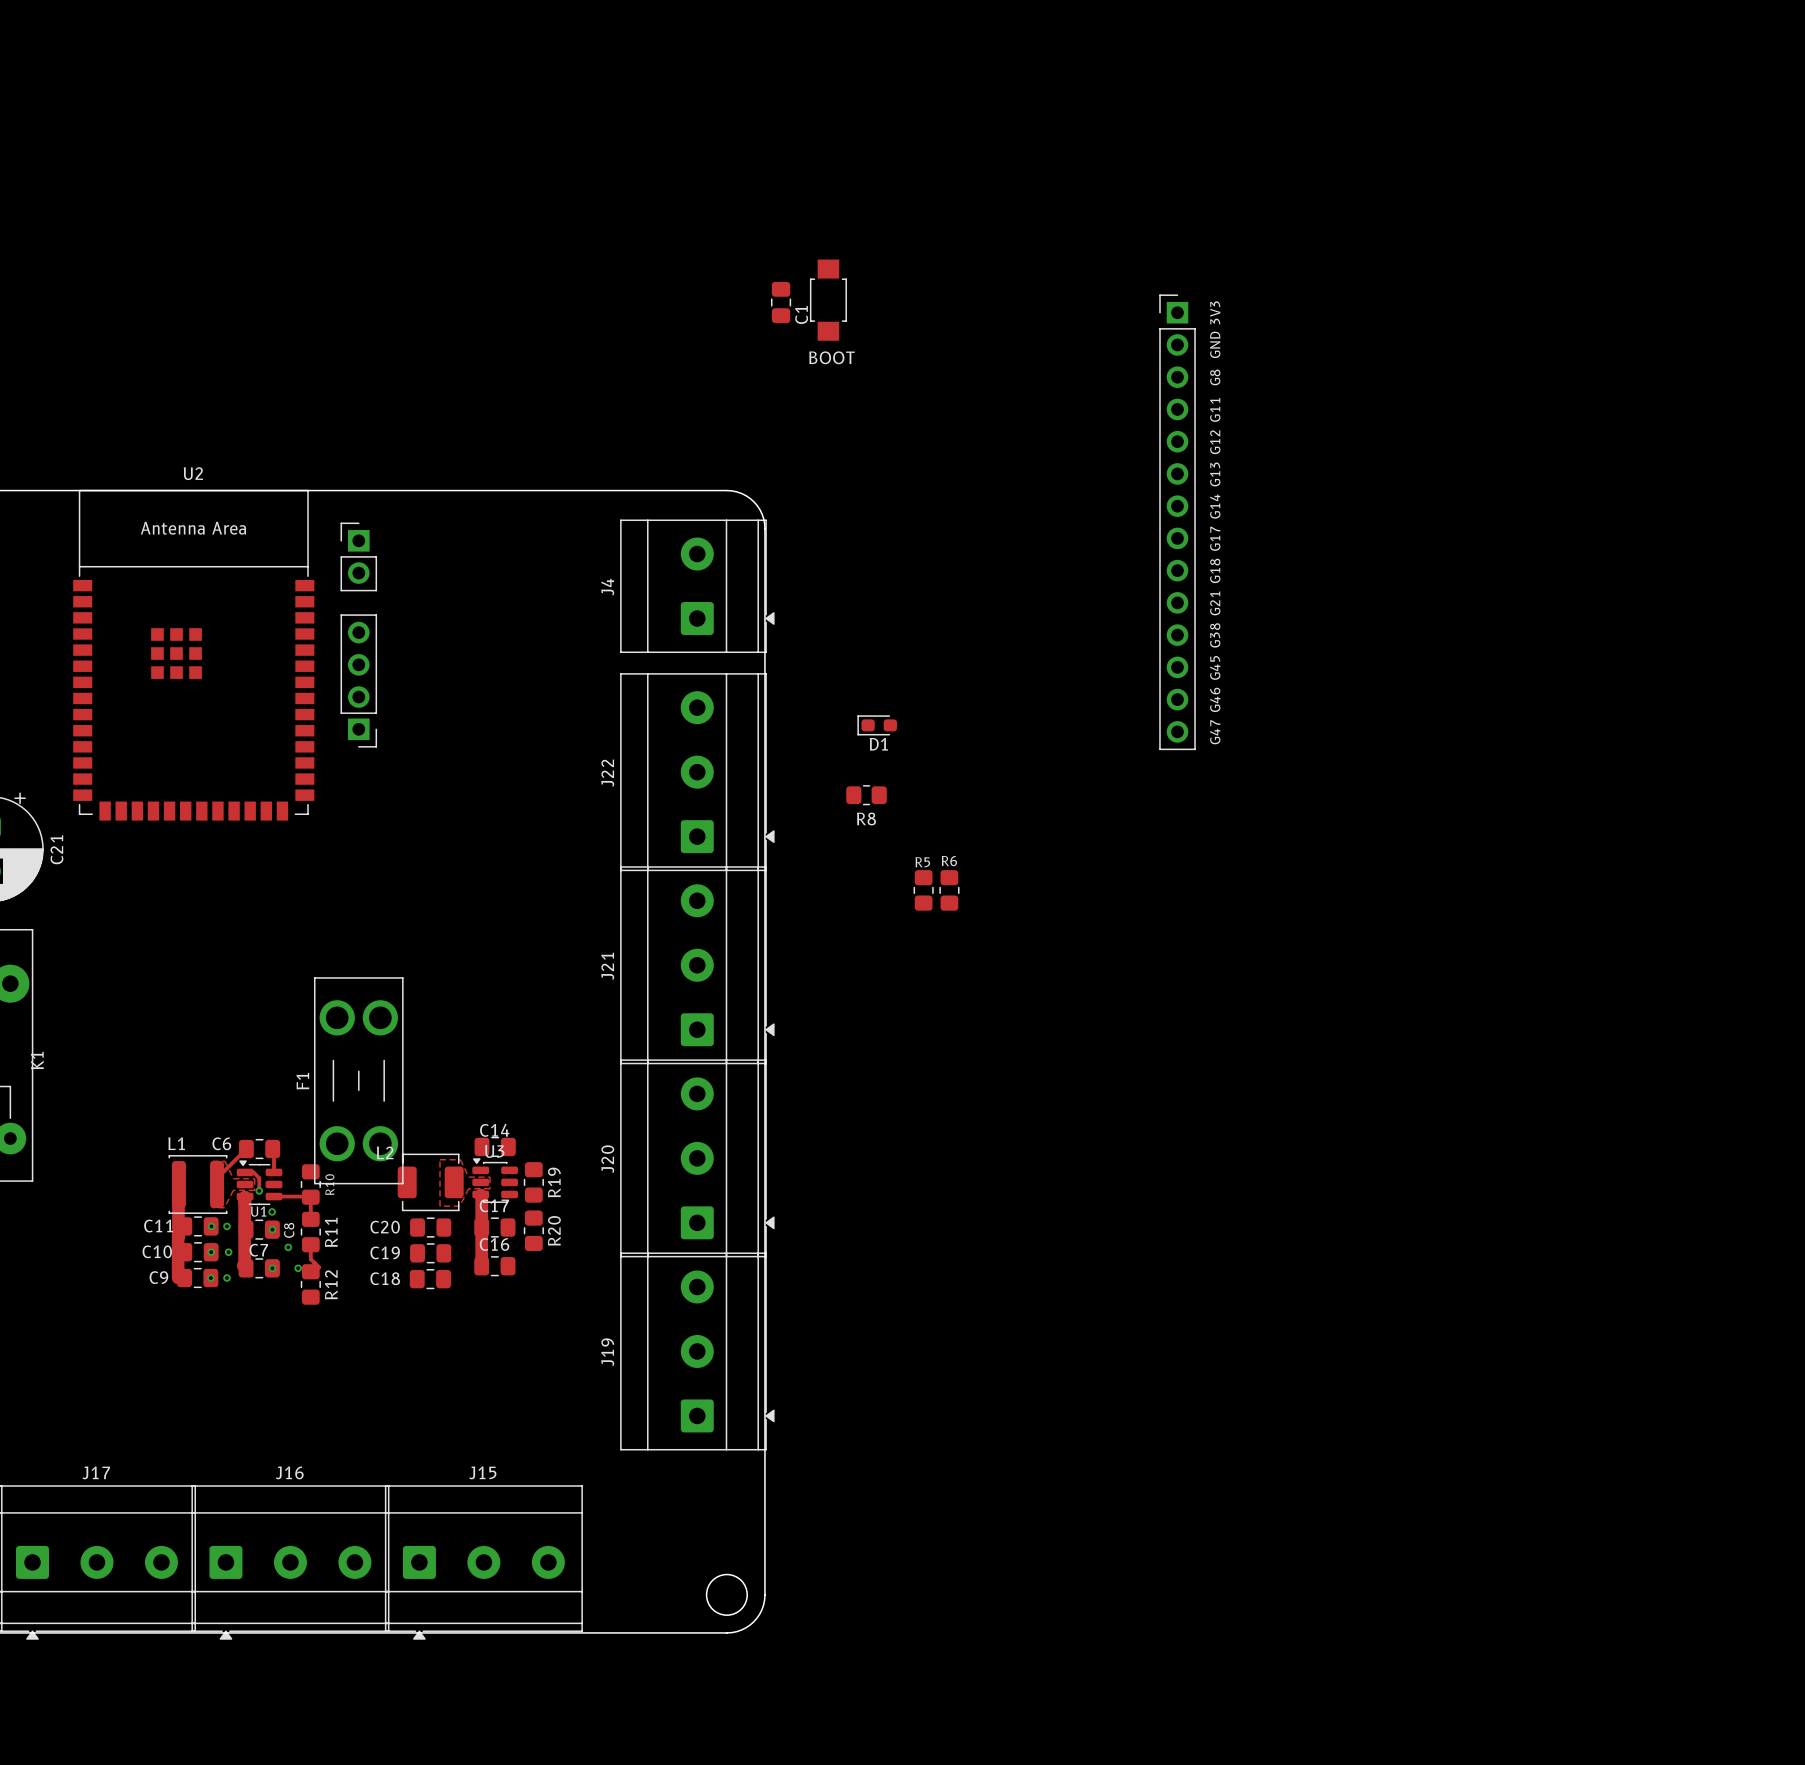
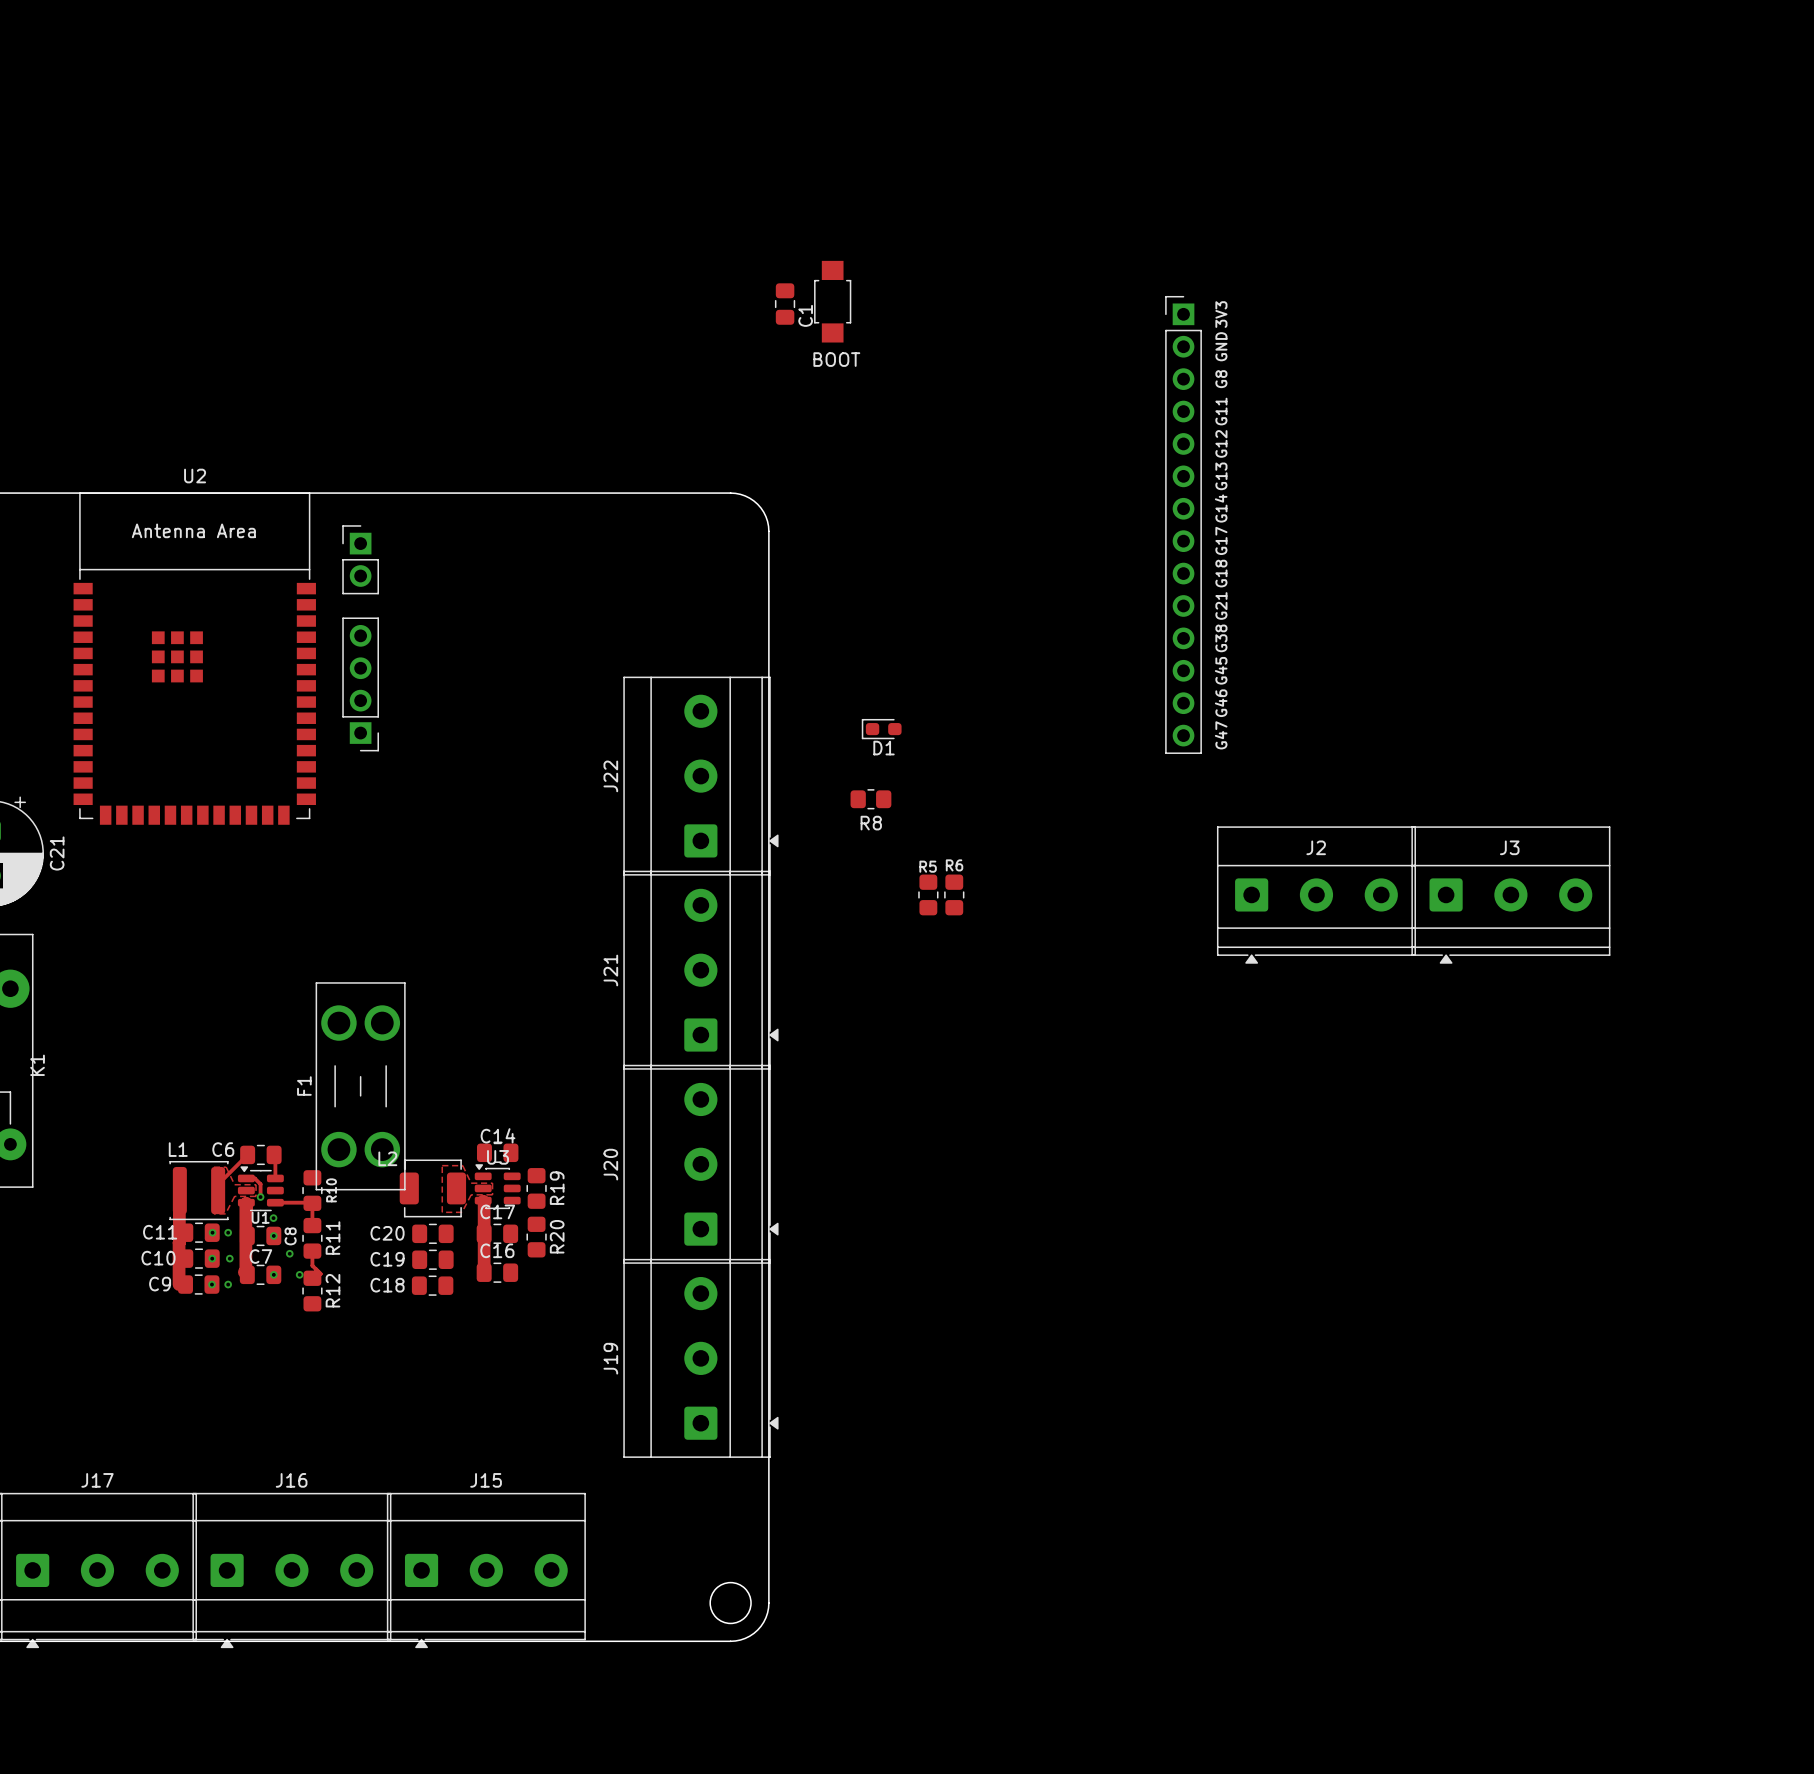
J4: (697, 586) -> none
J2: none -> (1316, 895)
J3: none -> (1510, 895)

